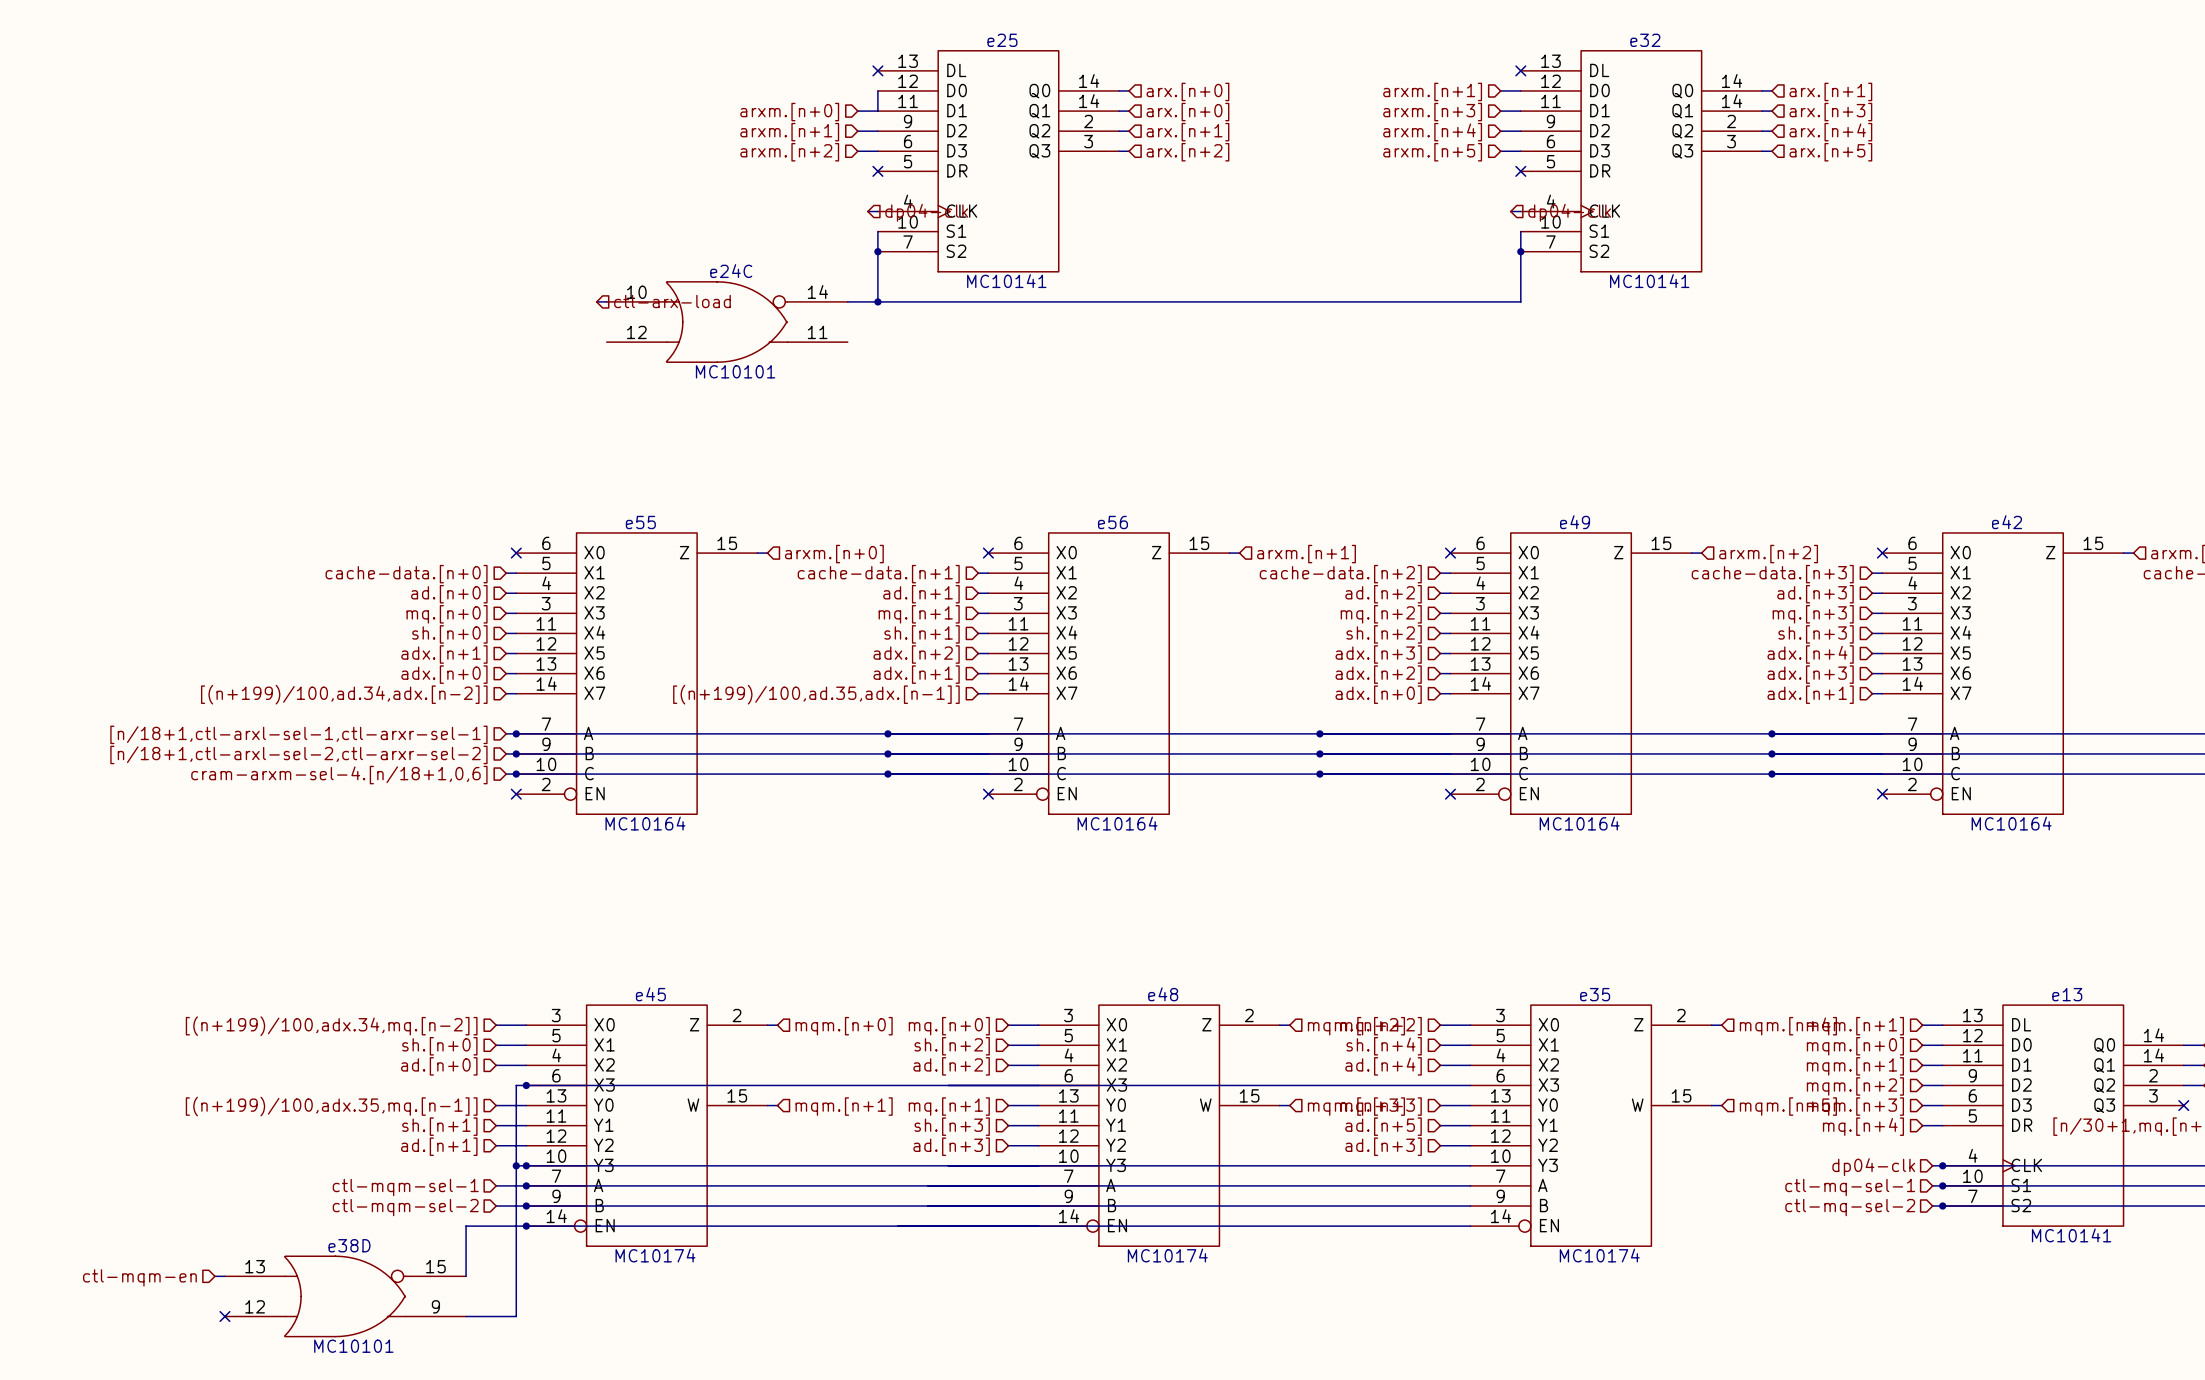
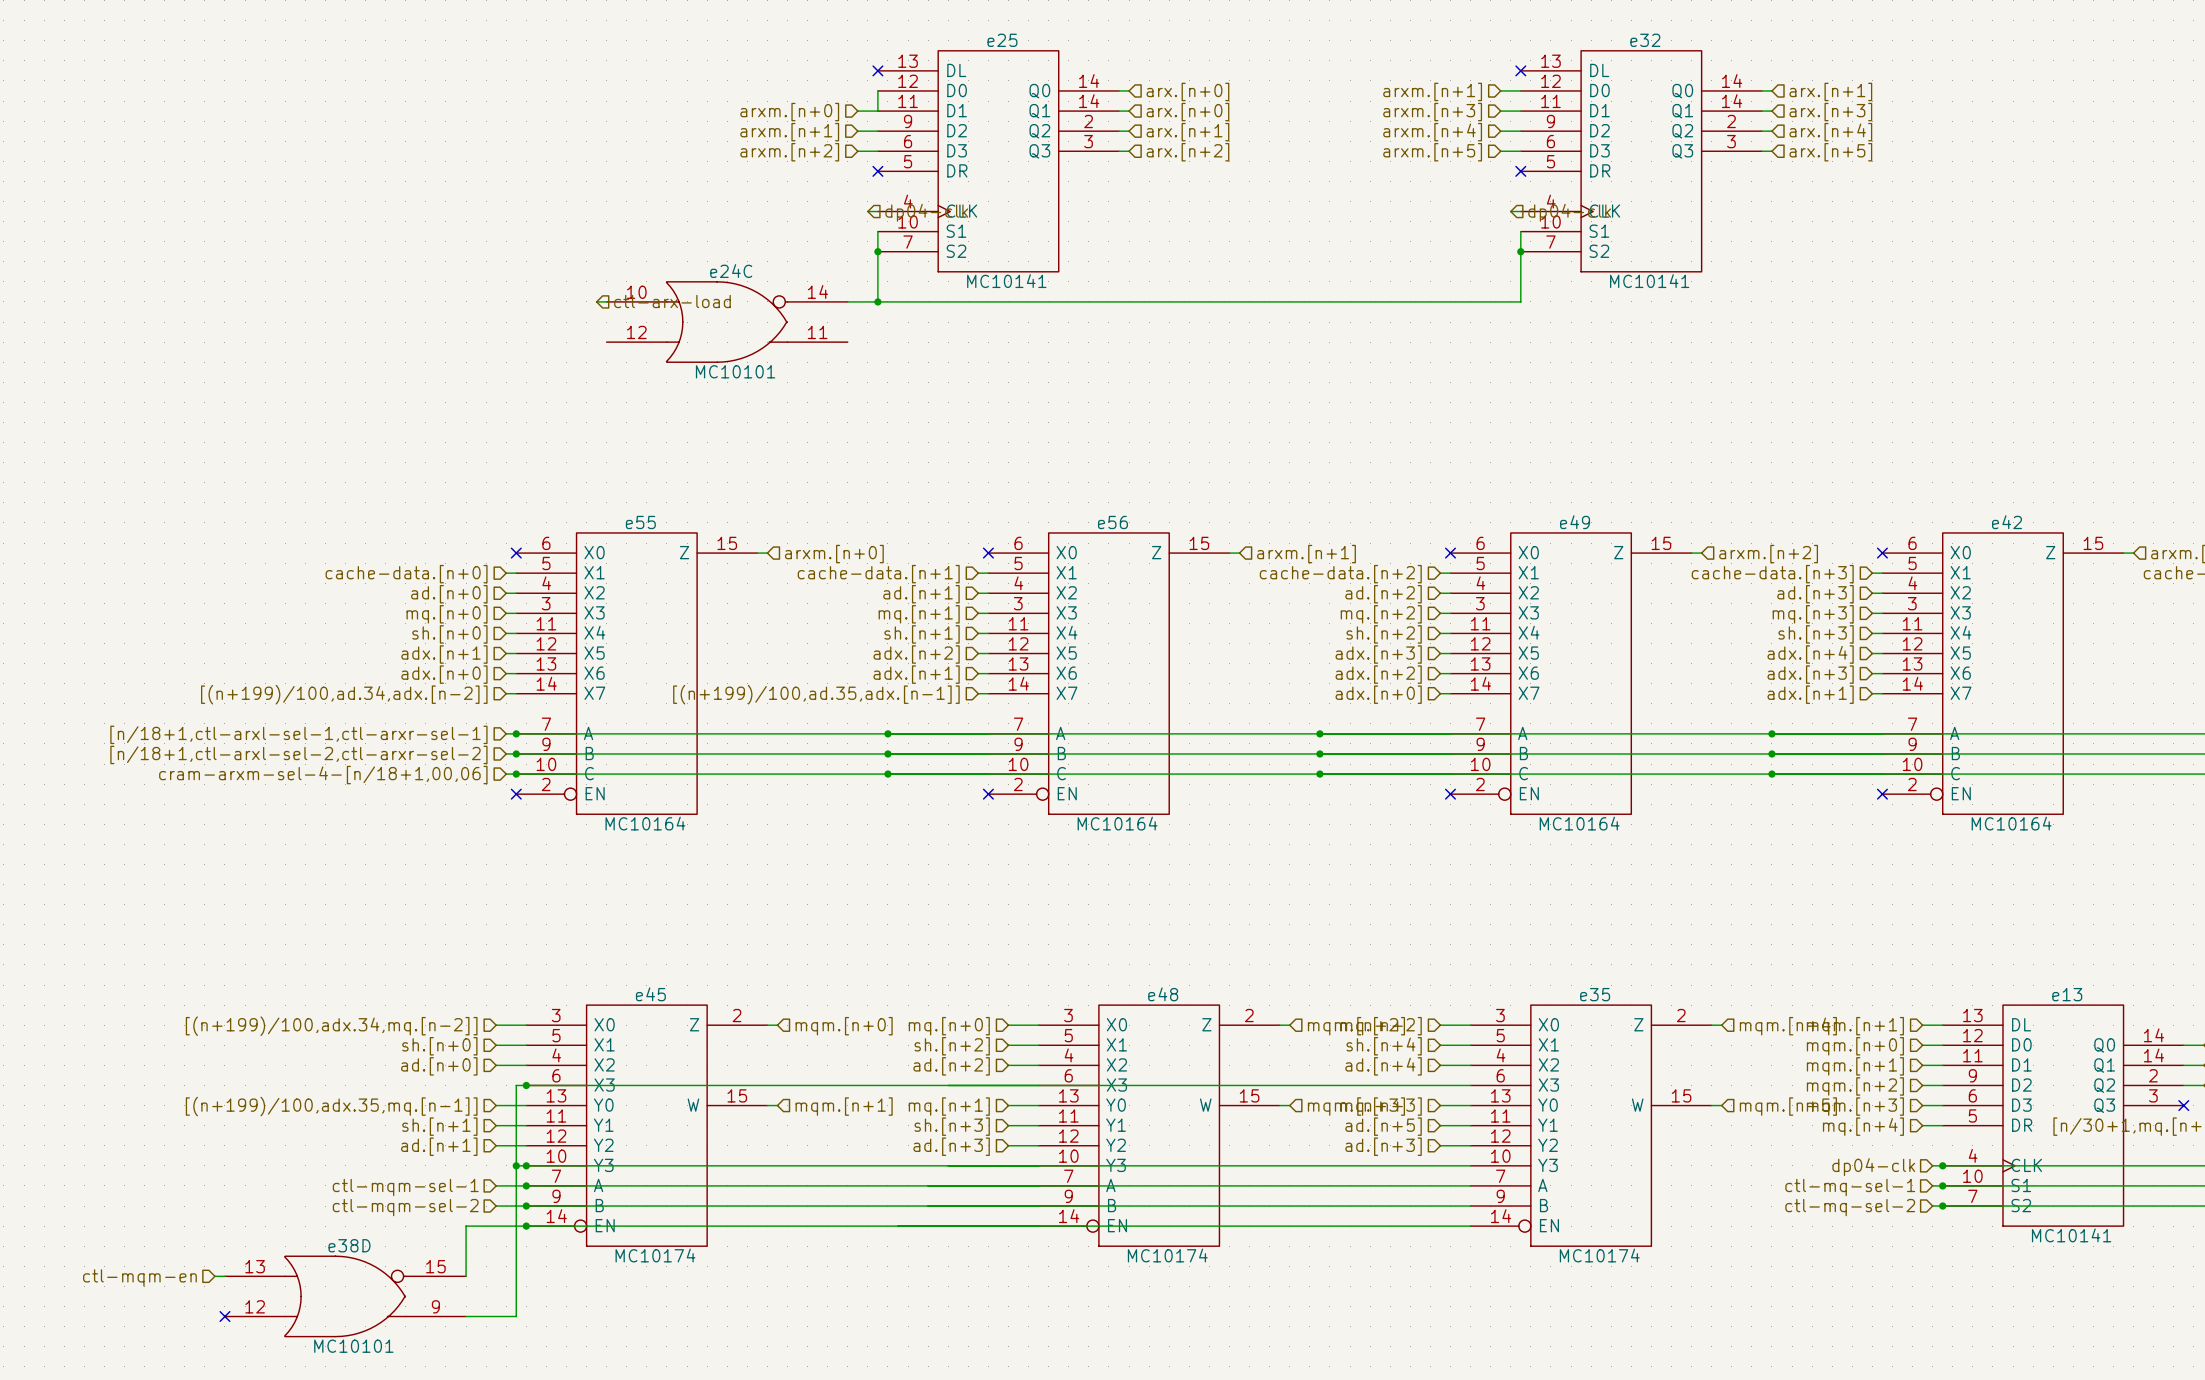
hierarchical label: cram-arxm-sel-4.[n/18+1,0,6] (339, 775) -> cram-arxm-sel-4-[n/18+1,00,06] (323, 775)

